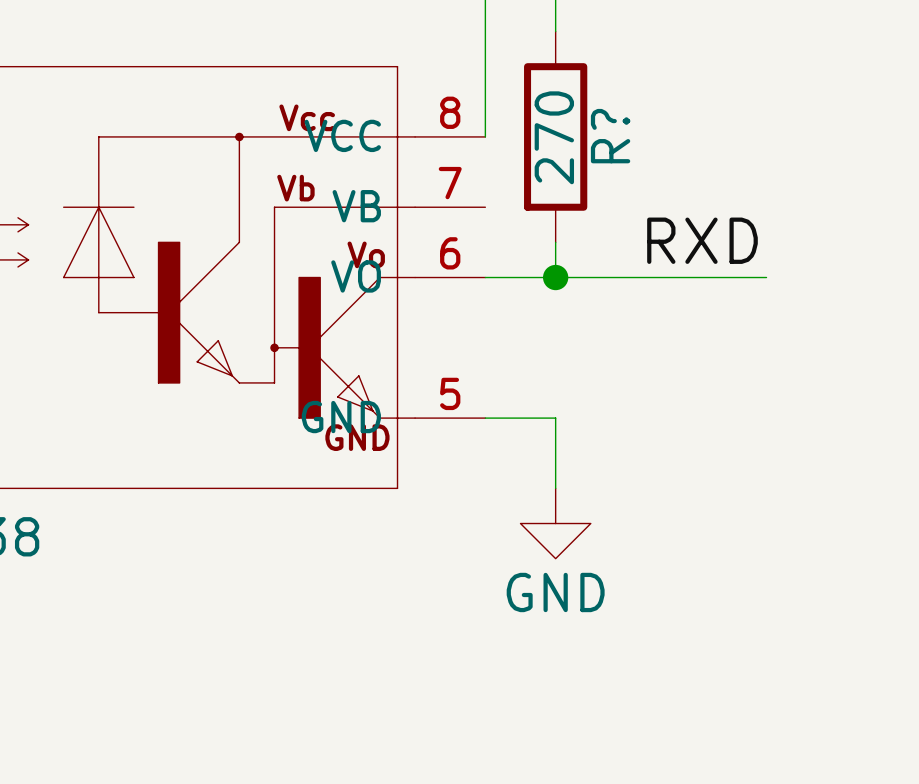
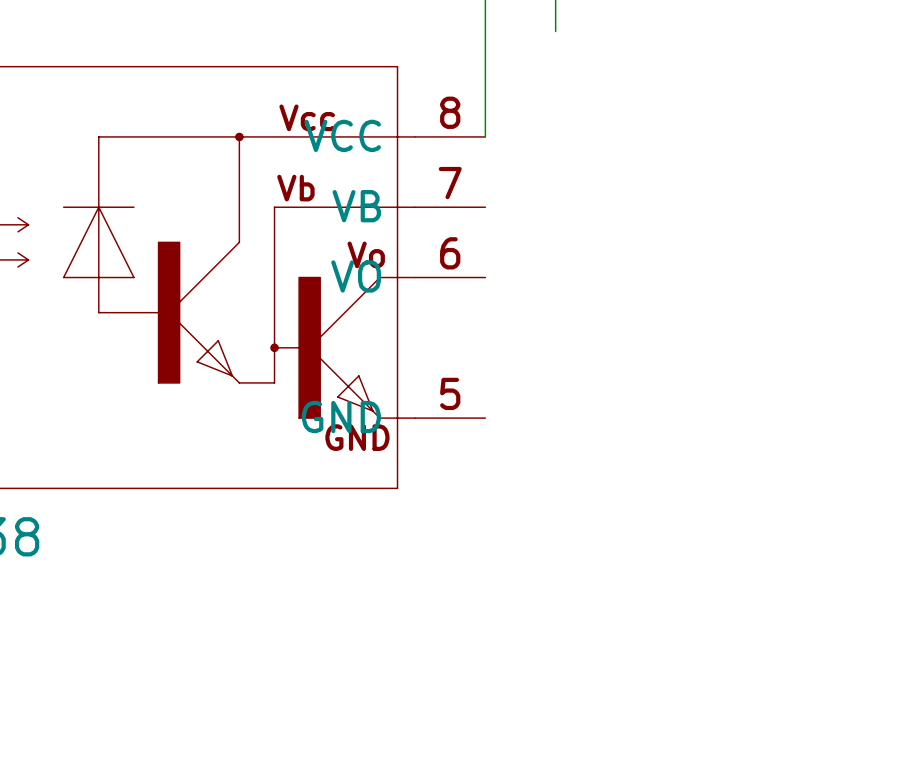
R?: 270 (555, 136) -> none
label: RXD (702, 240) -> none
wire: (555, 242) (555, 277) -> none
wire: (485, 277) (766, 277) -> none
junction: (555, 277) -> none
wire: (485, 418) (555, 418) (555, 488) -> none
power symbol: GND (555, 523) -> none

